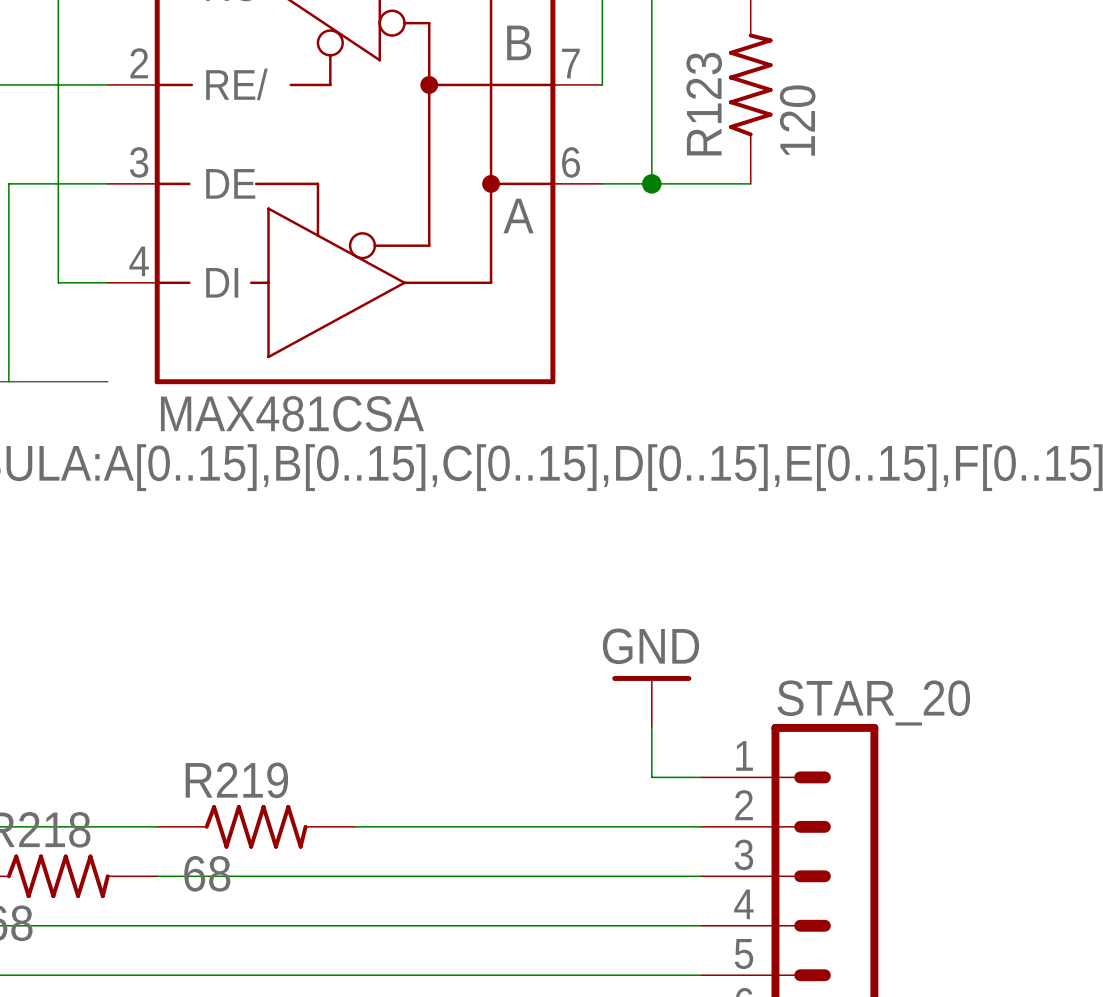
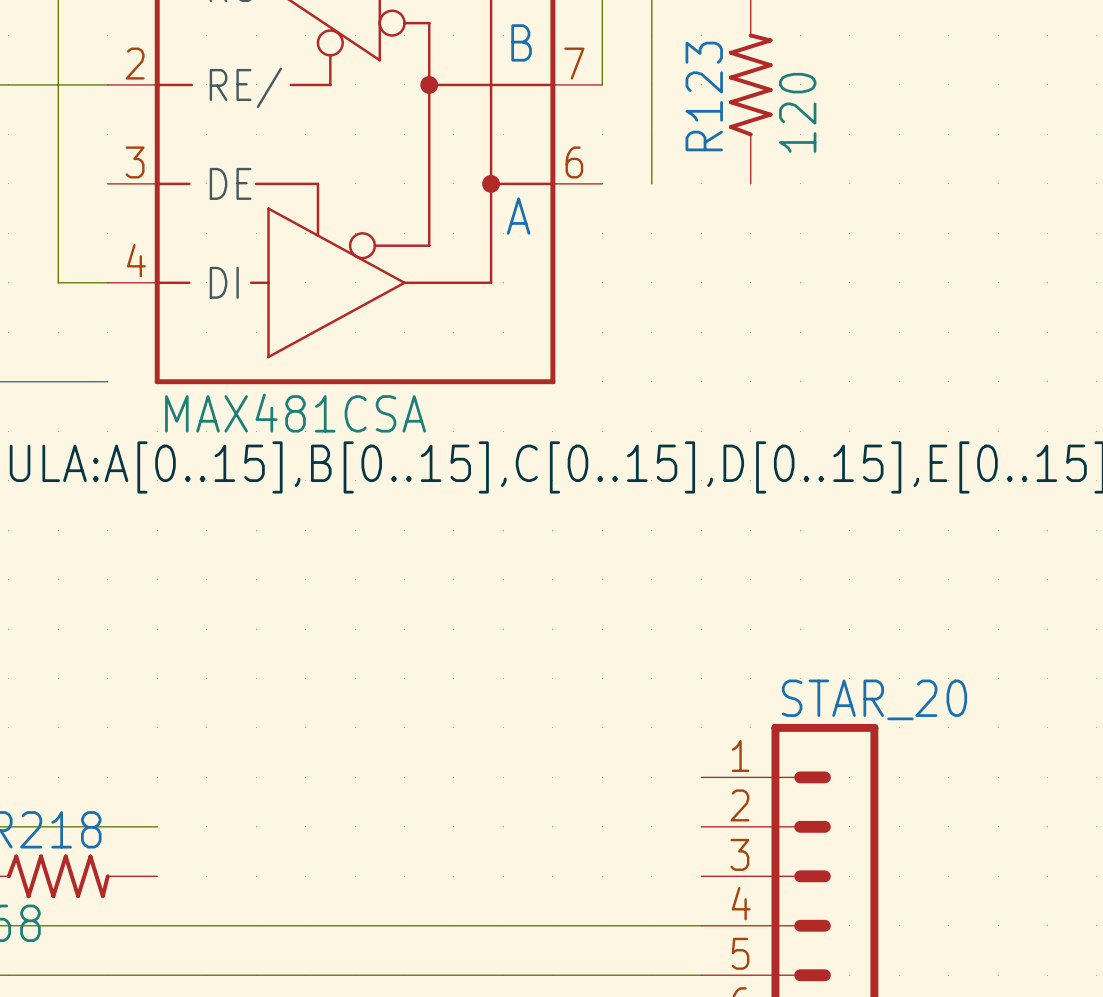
wire: (107, 183) (8, 183) (8, 381) -> none
wire: (602, 183) (750, 183) -> none
junction: (651, 183) -> none
power symbol: GND (651, 701) -> none
wire: (651, 727) (651, 777) (701, 777) -> none
R219: 68 (256, 826) -> none
wire: (355, 826) (701, 826) -> none
wire: (157, 876) (701, 876) -> none

